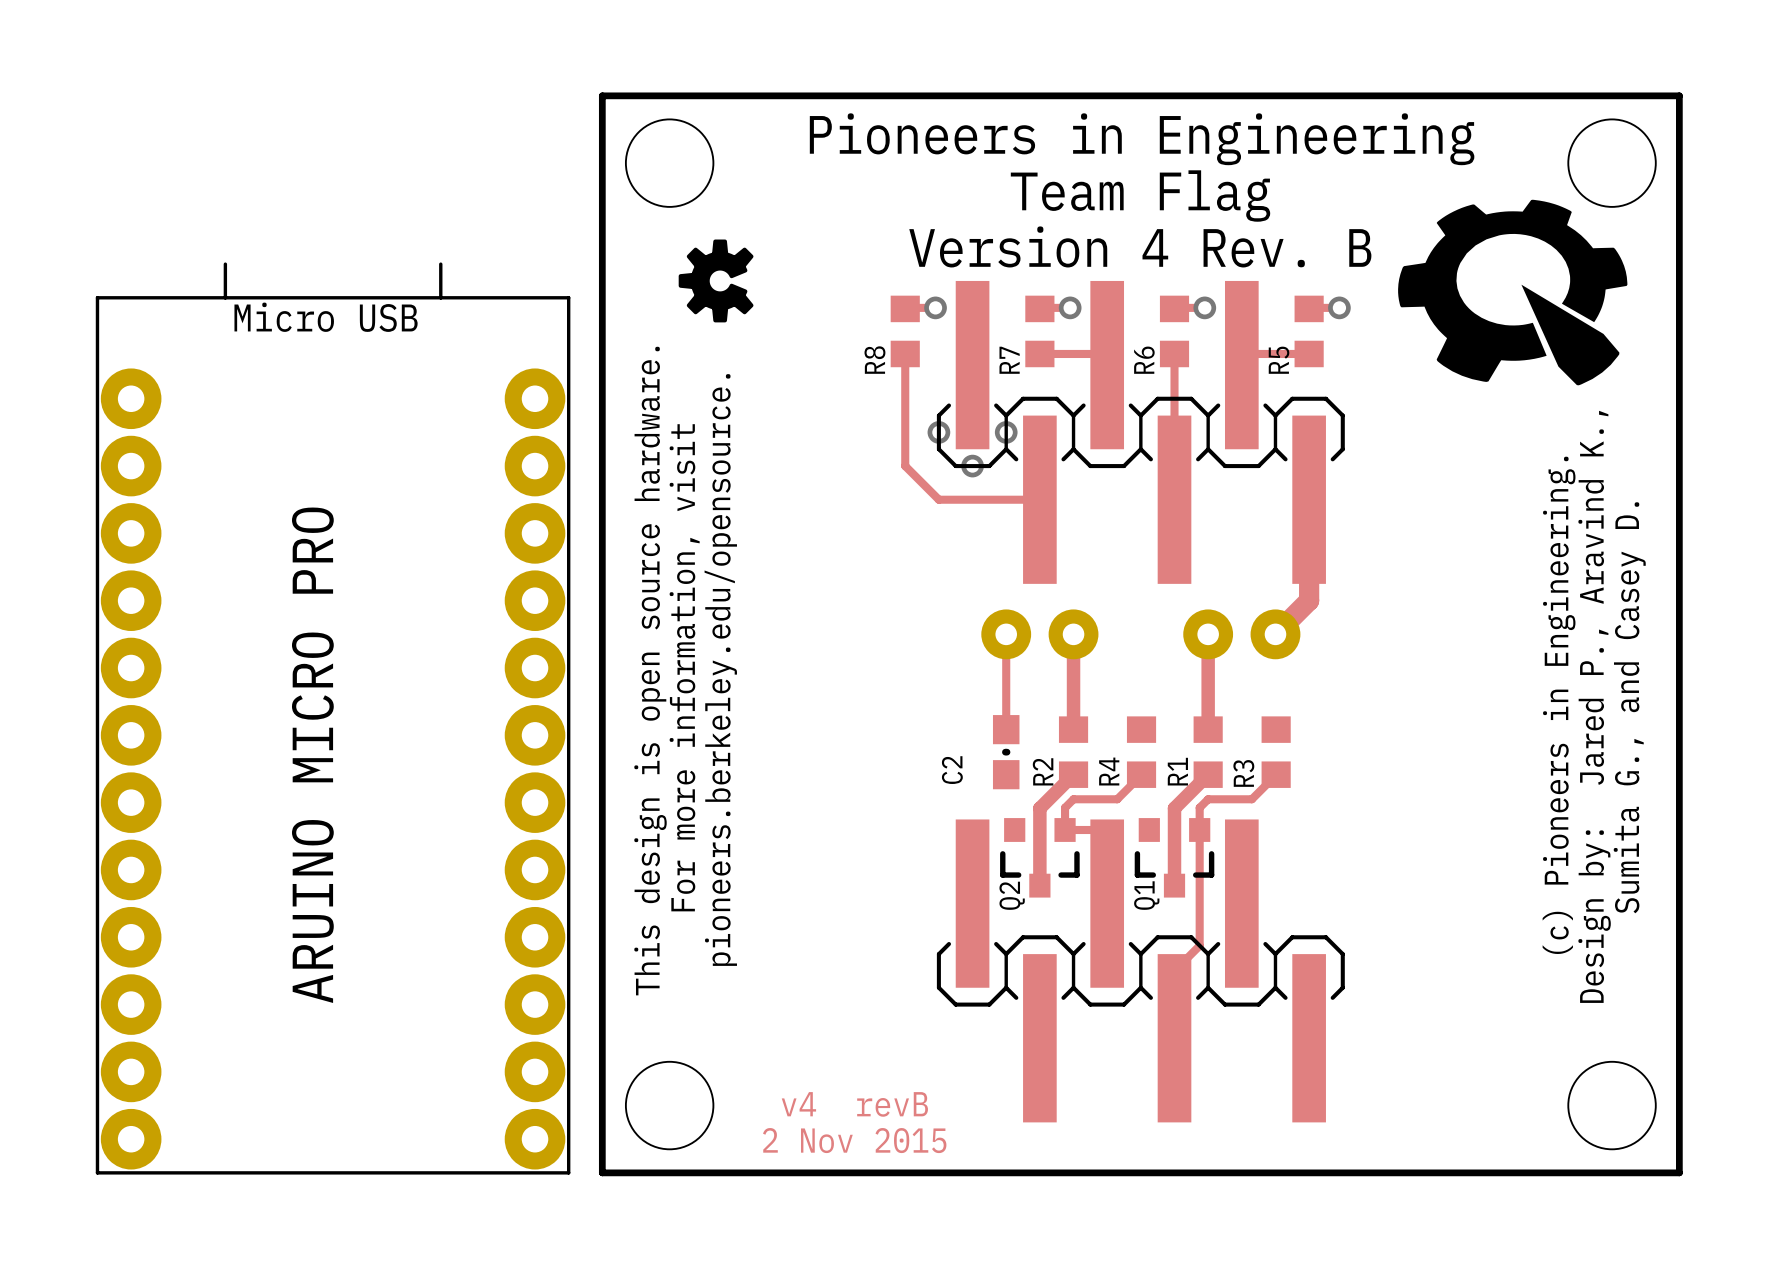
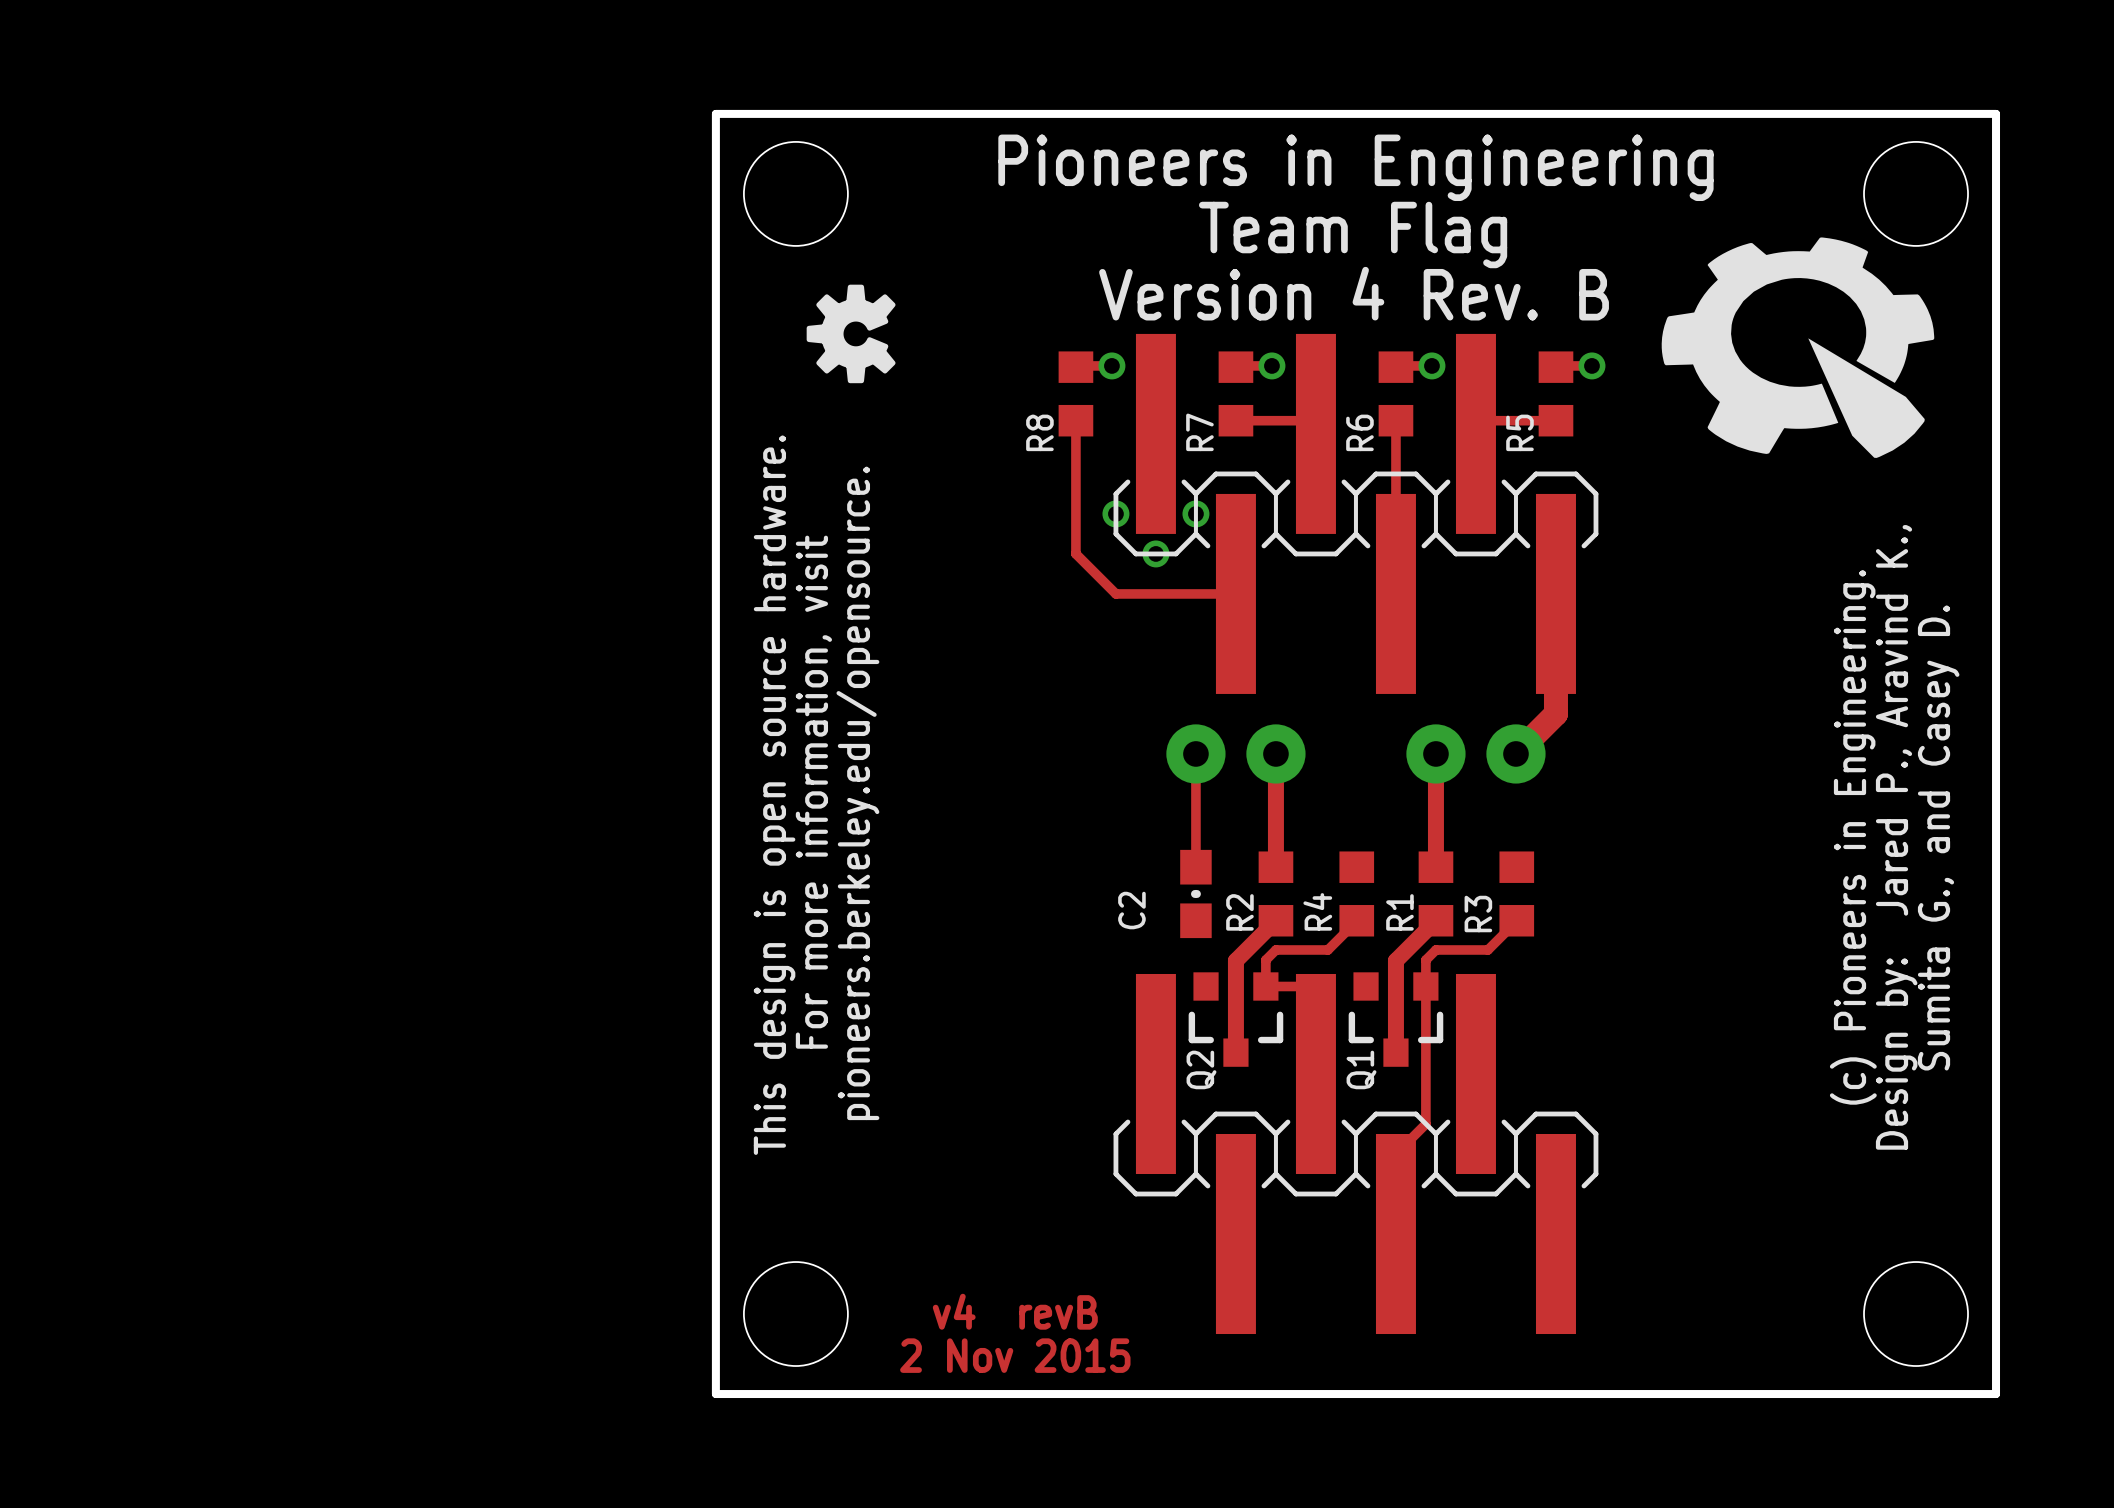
part: (333, 718) -> none

